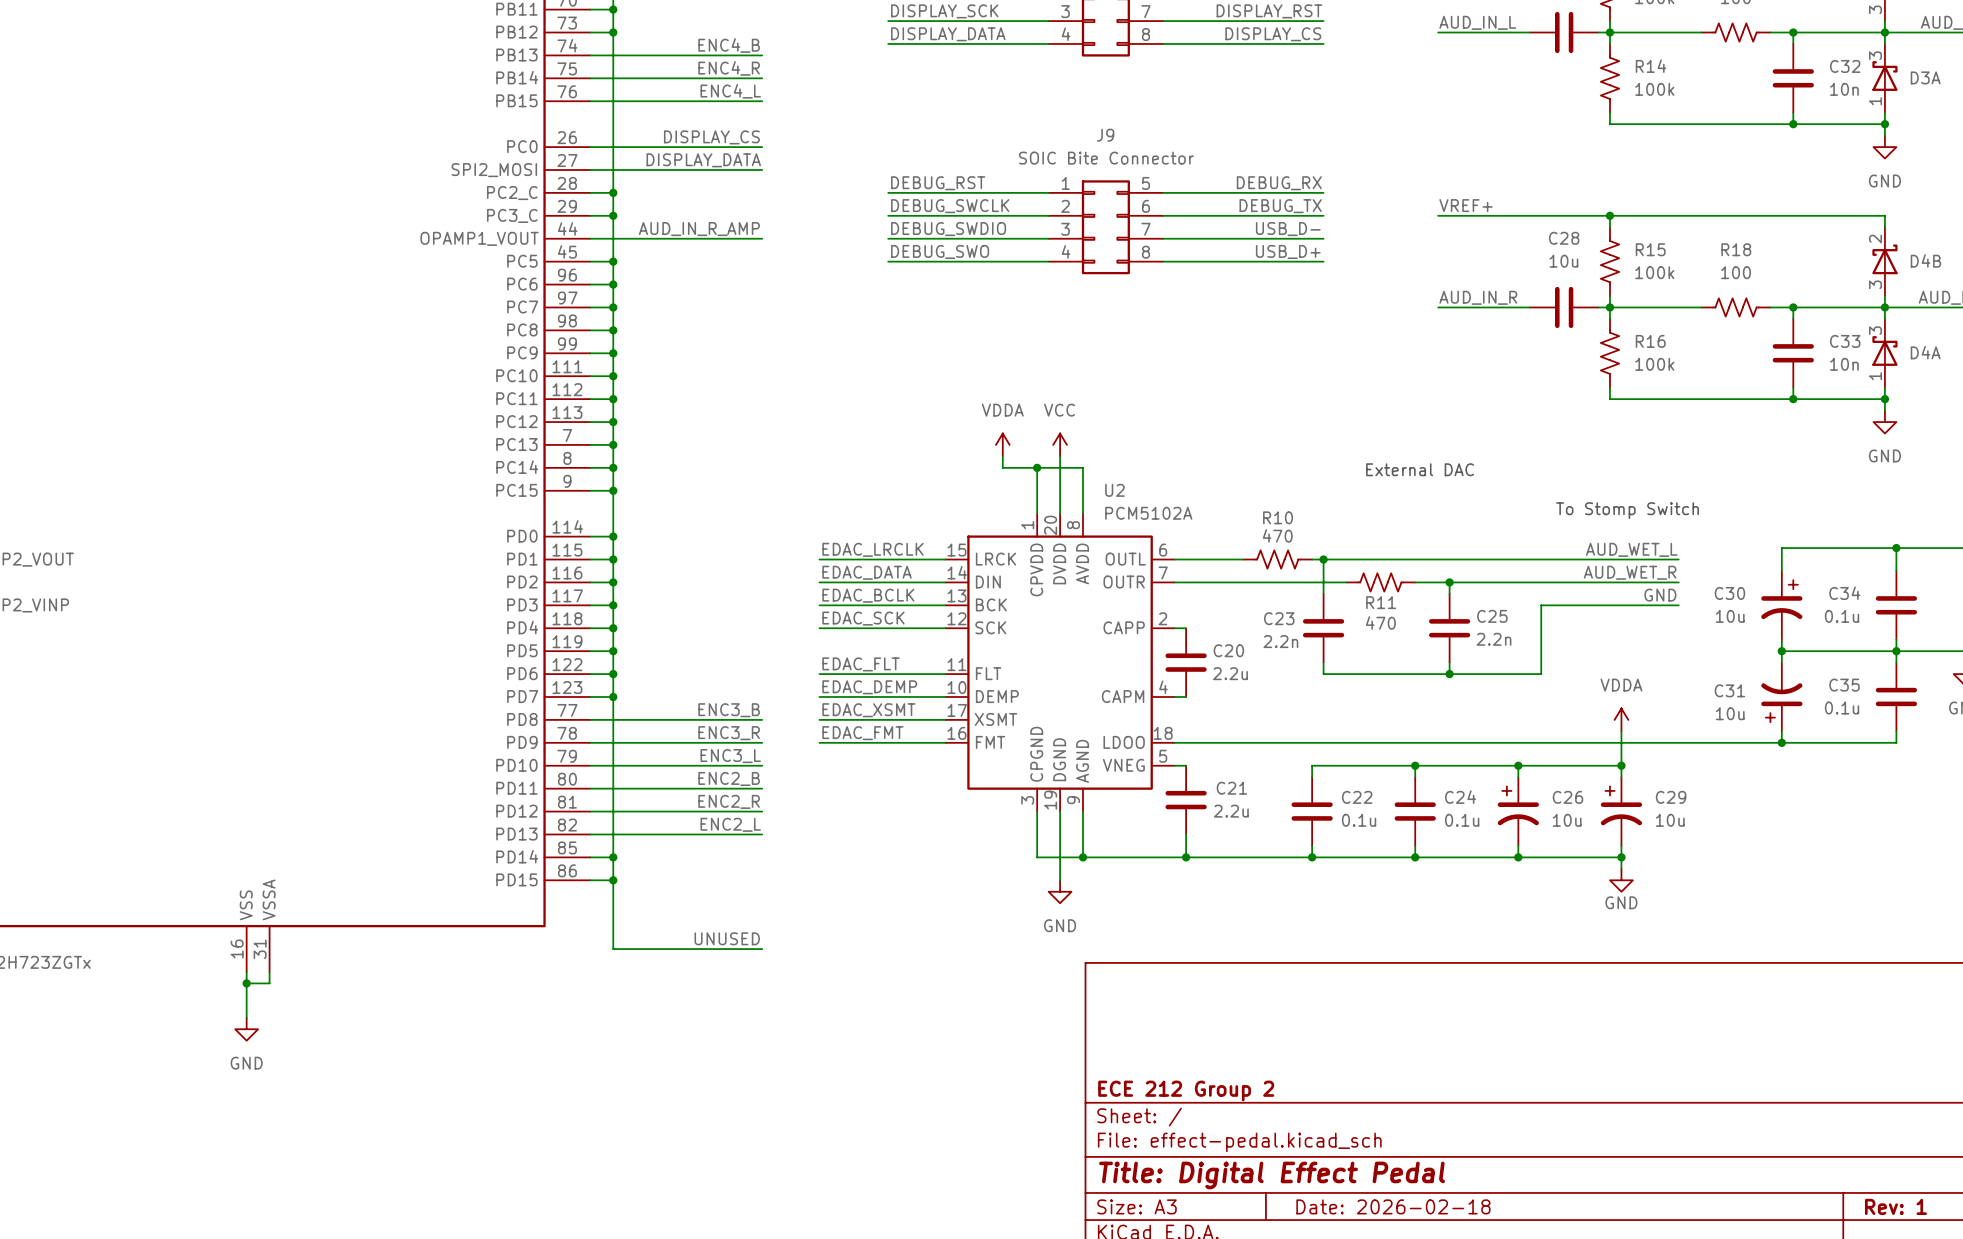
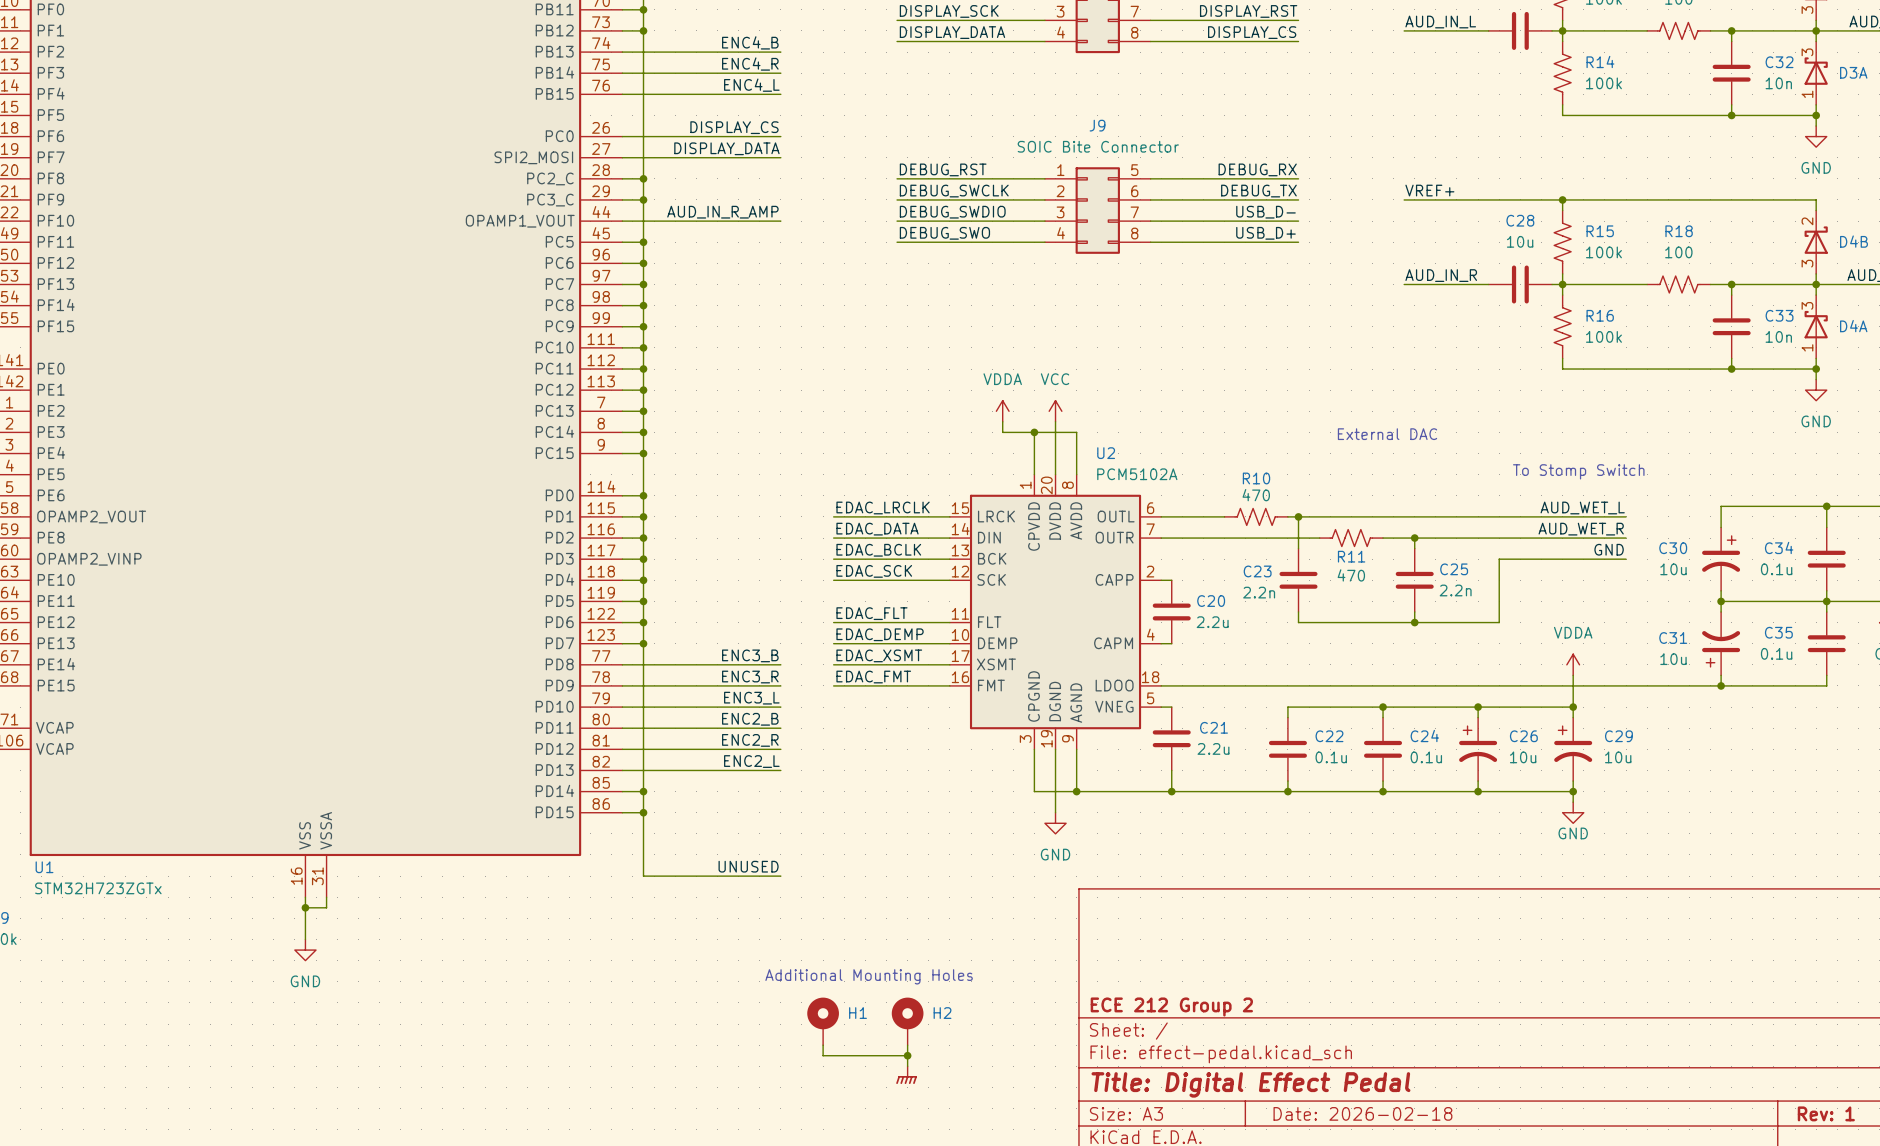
text: none -> Additional Mounting Holes (869, 976)
H1: none -> (823, 1021)
H2: none -> (907, 1021)
wire: none -> (823, 1045) (823, 1055) (907, 1055)
wire: none -> (907, 1045) (907, 1066)
junction: none -> (907, 1055)
power symbol: none -> (906, 1075)

